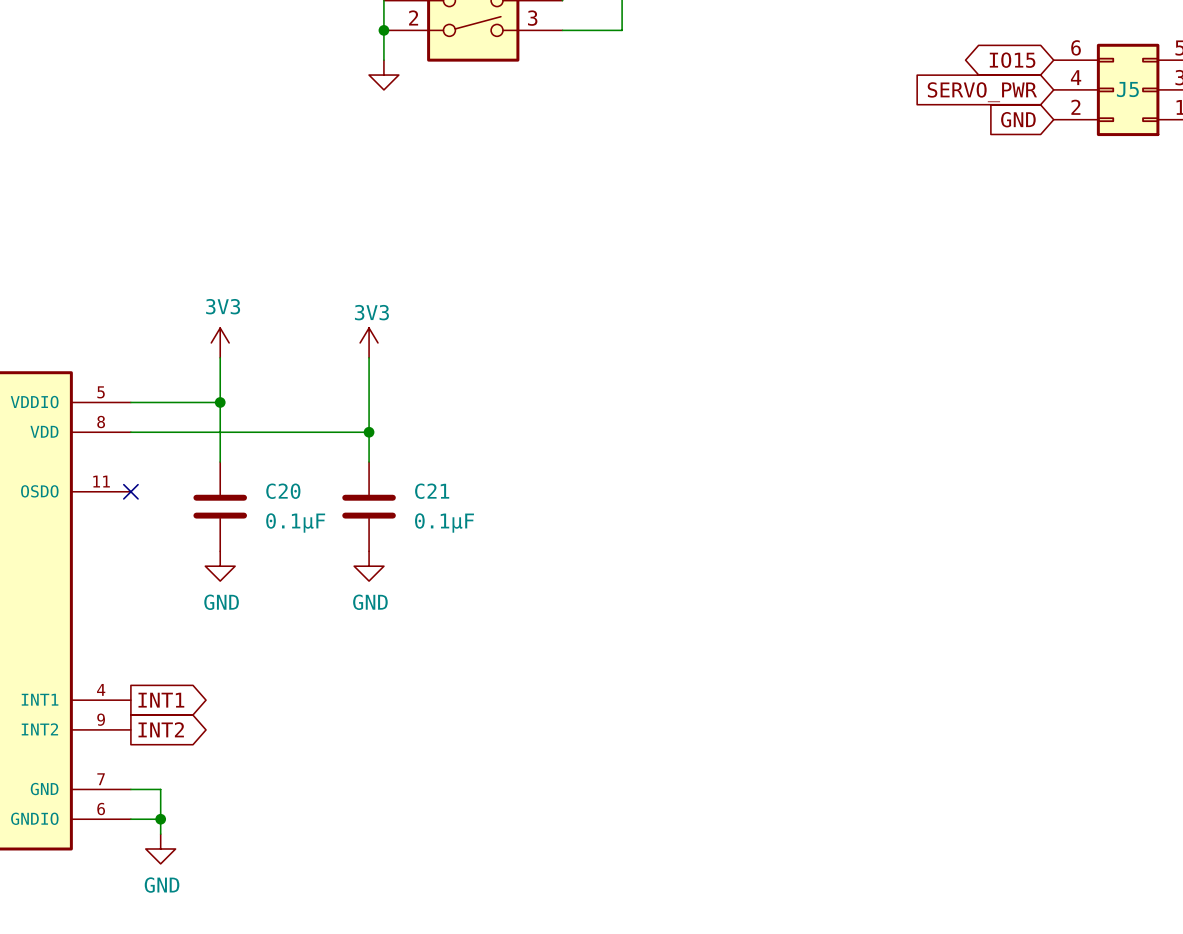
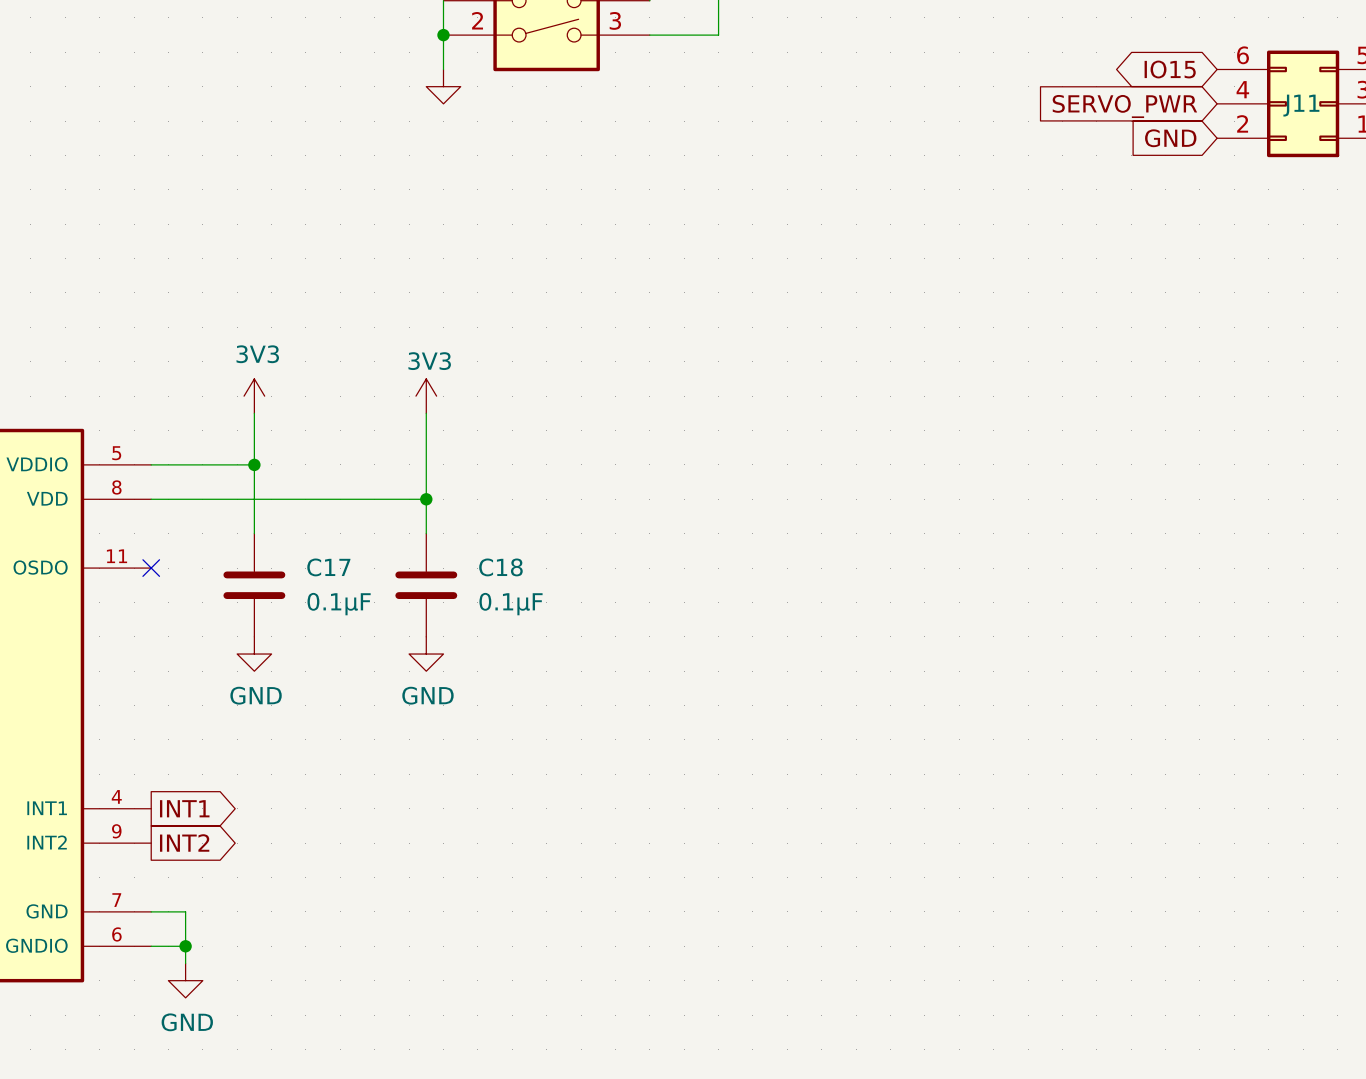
J5 name: J5 (1127, 89) -> J11 (1301, 105)
C20 name: C20 (283, 491) -> C17 (328, 567)
C21 name: C21 (432, 491) -> C18 (500, 567)

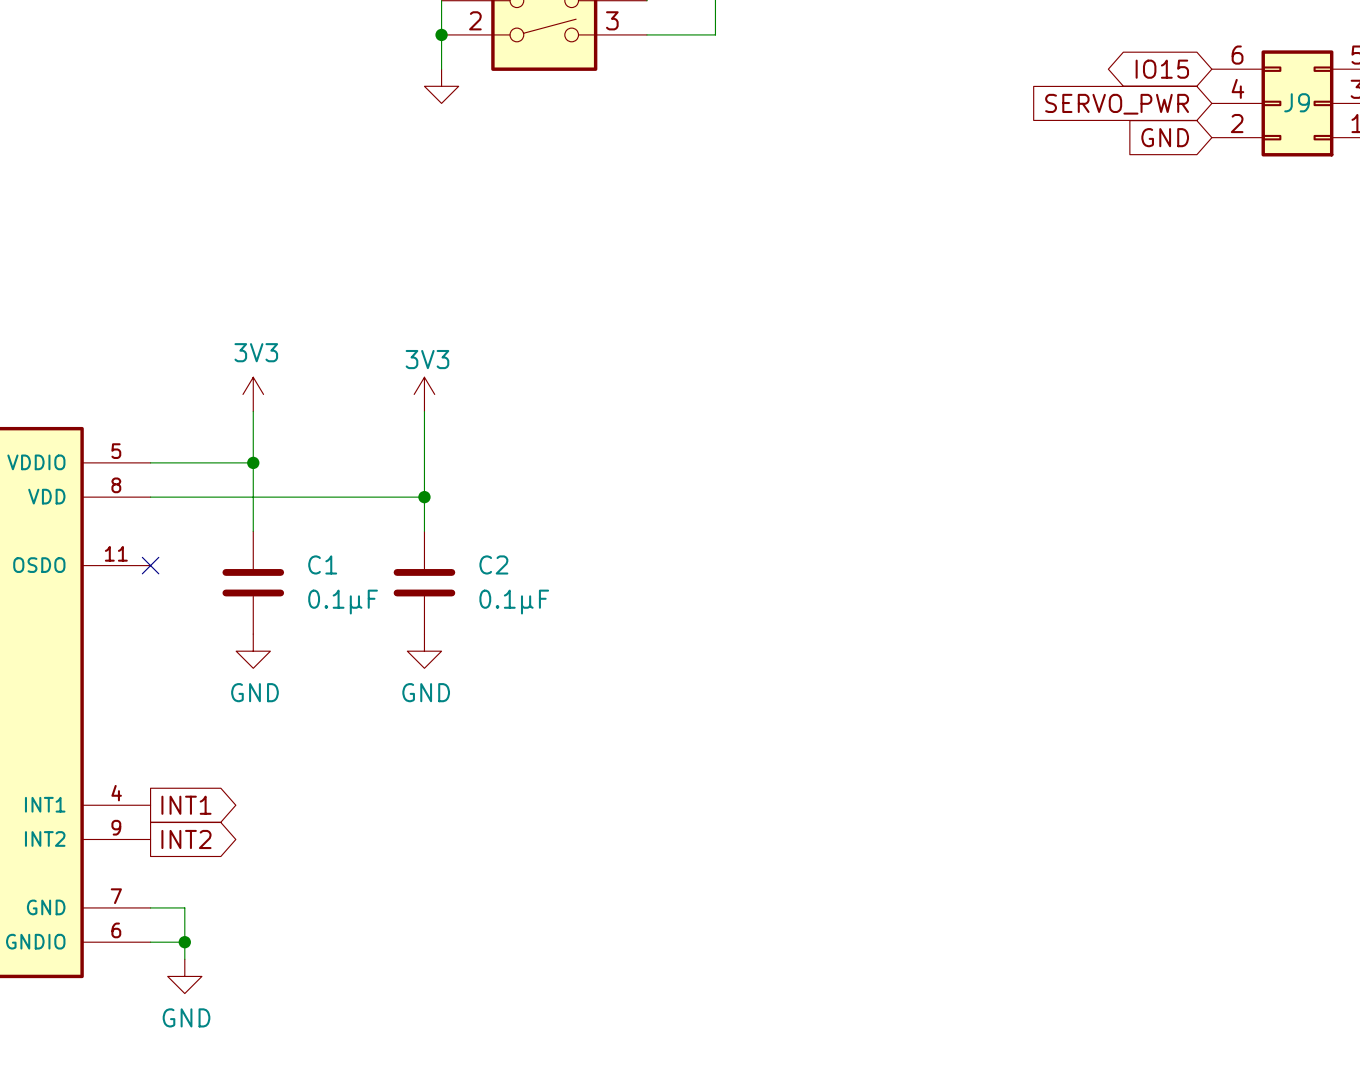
J11 name: J11 (1301, 105) -> J9 (1297, 102)
C17 name: C17 (328, 567) -> C1 (322, 564)
C18 name: C18 (500, 567) -> C2 (493, 564)

